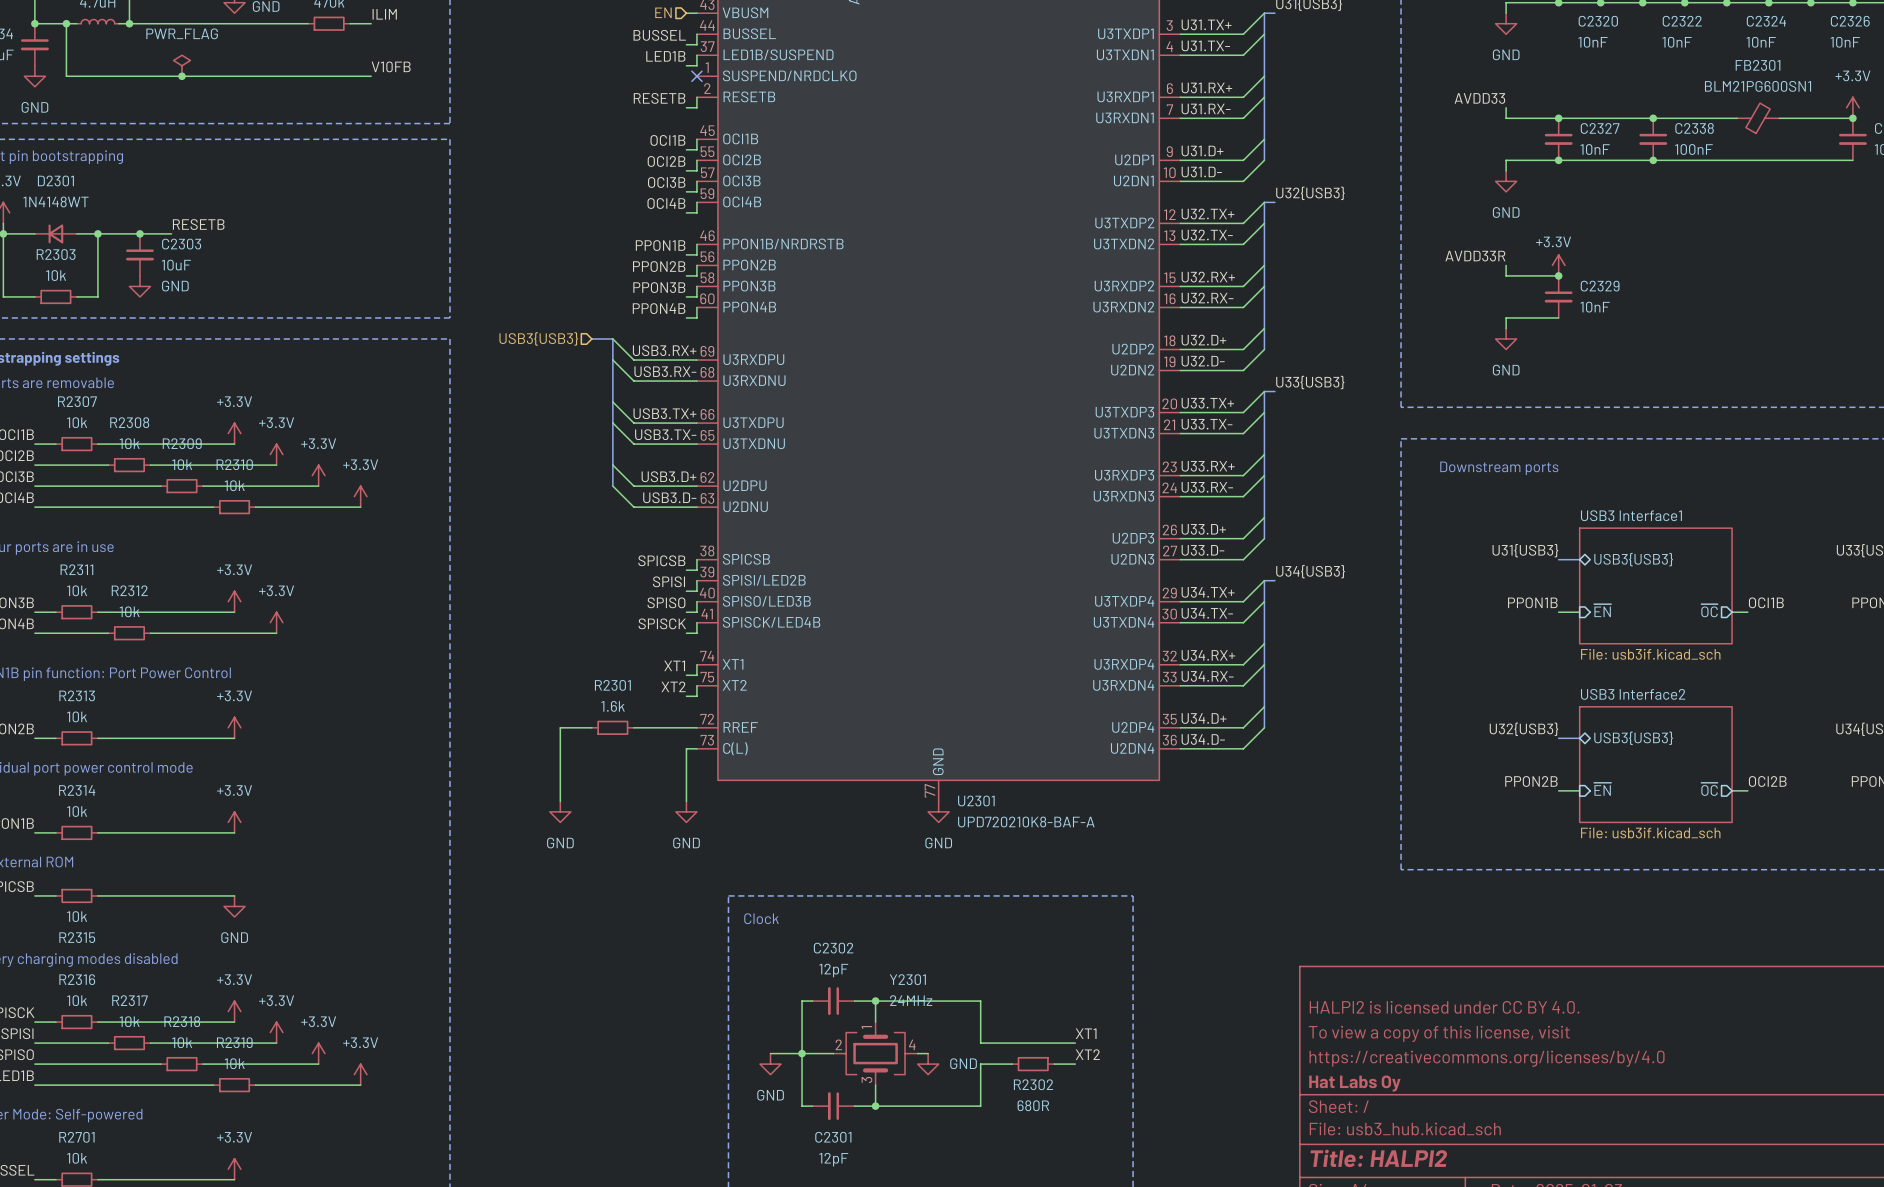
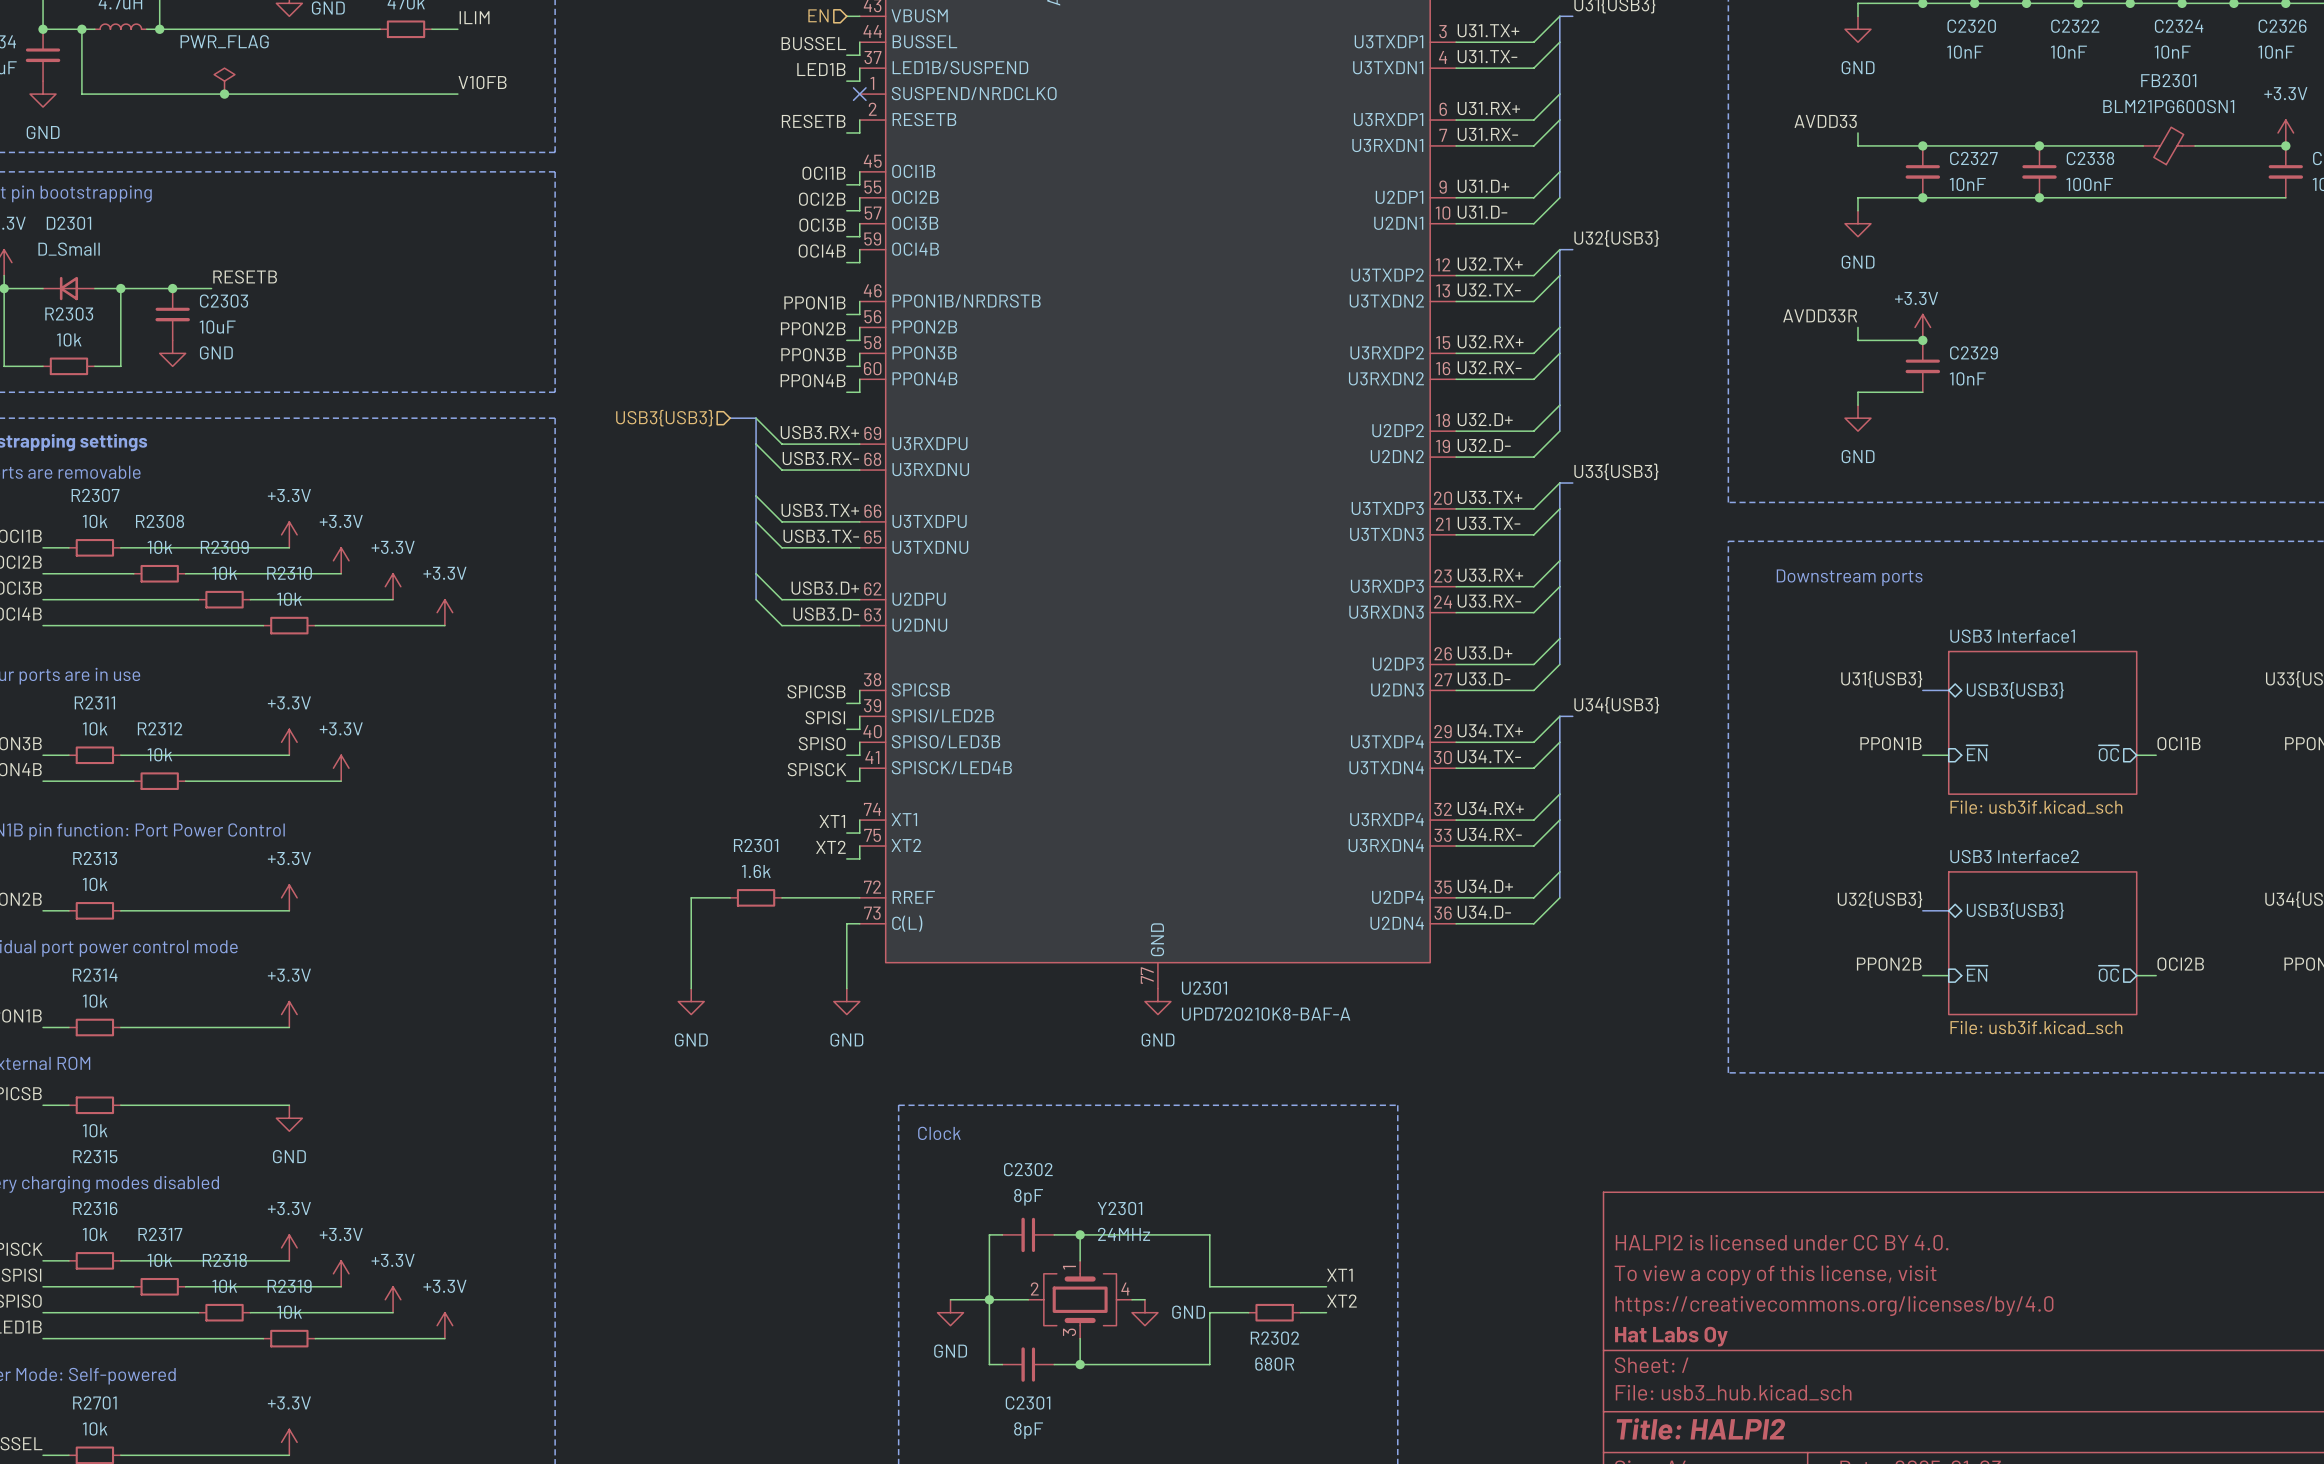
D2301 value: 1N4148WT (56, 201) -> D_Small (69, 249)
C2302 value: 12pF (833, 970) -> 8pF (1028, 1197)
C2301 value: 12pF (833, 1159) -> 8pF (1028, 1430)

